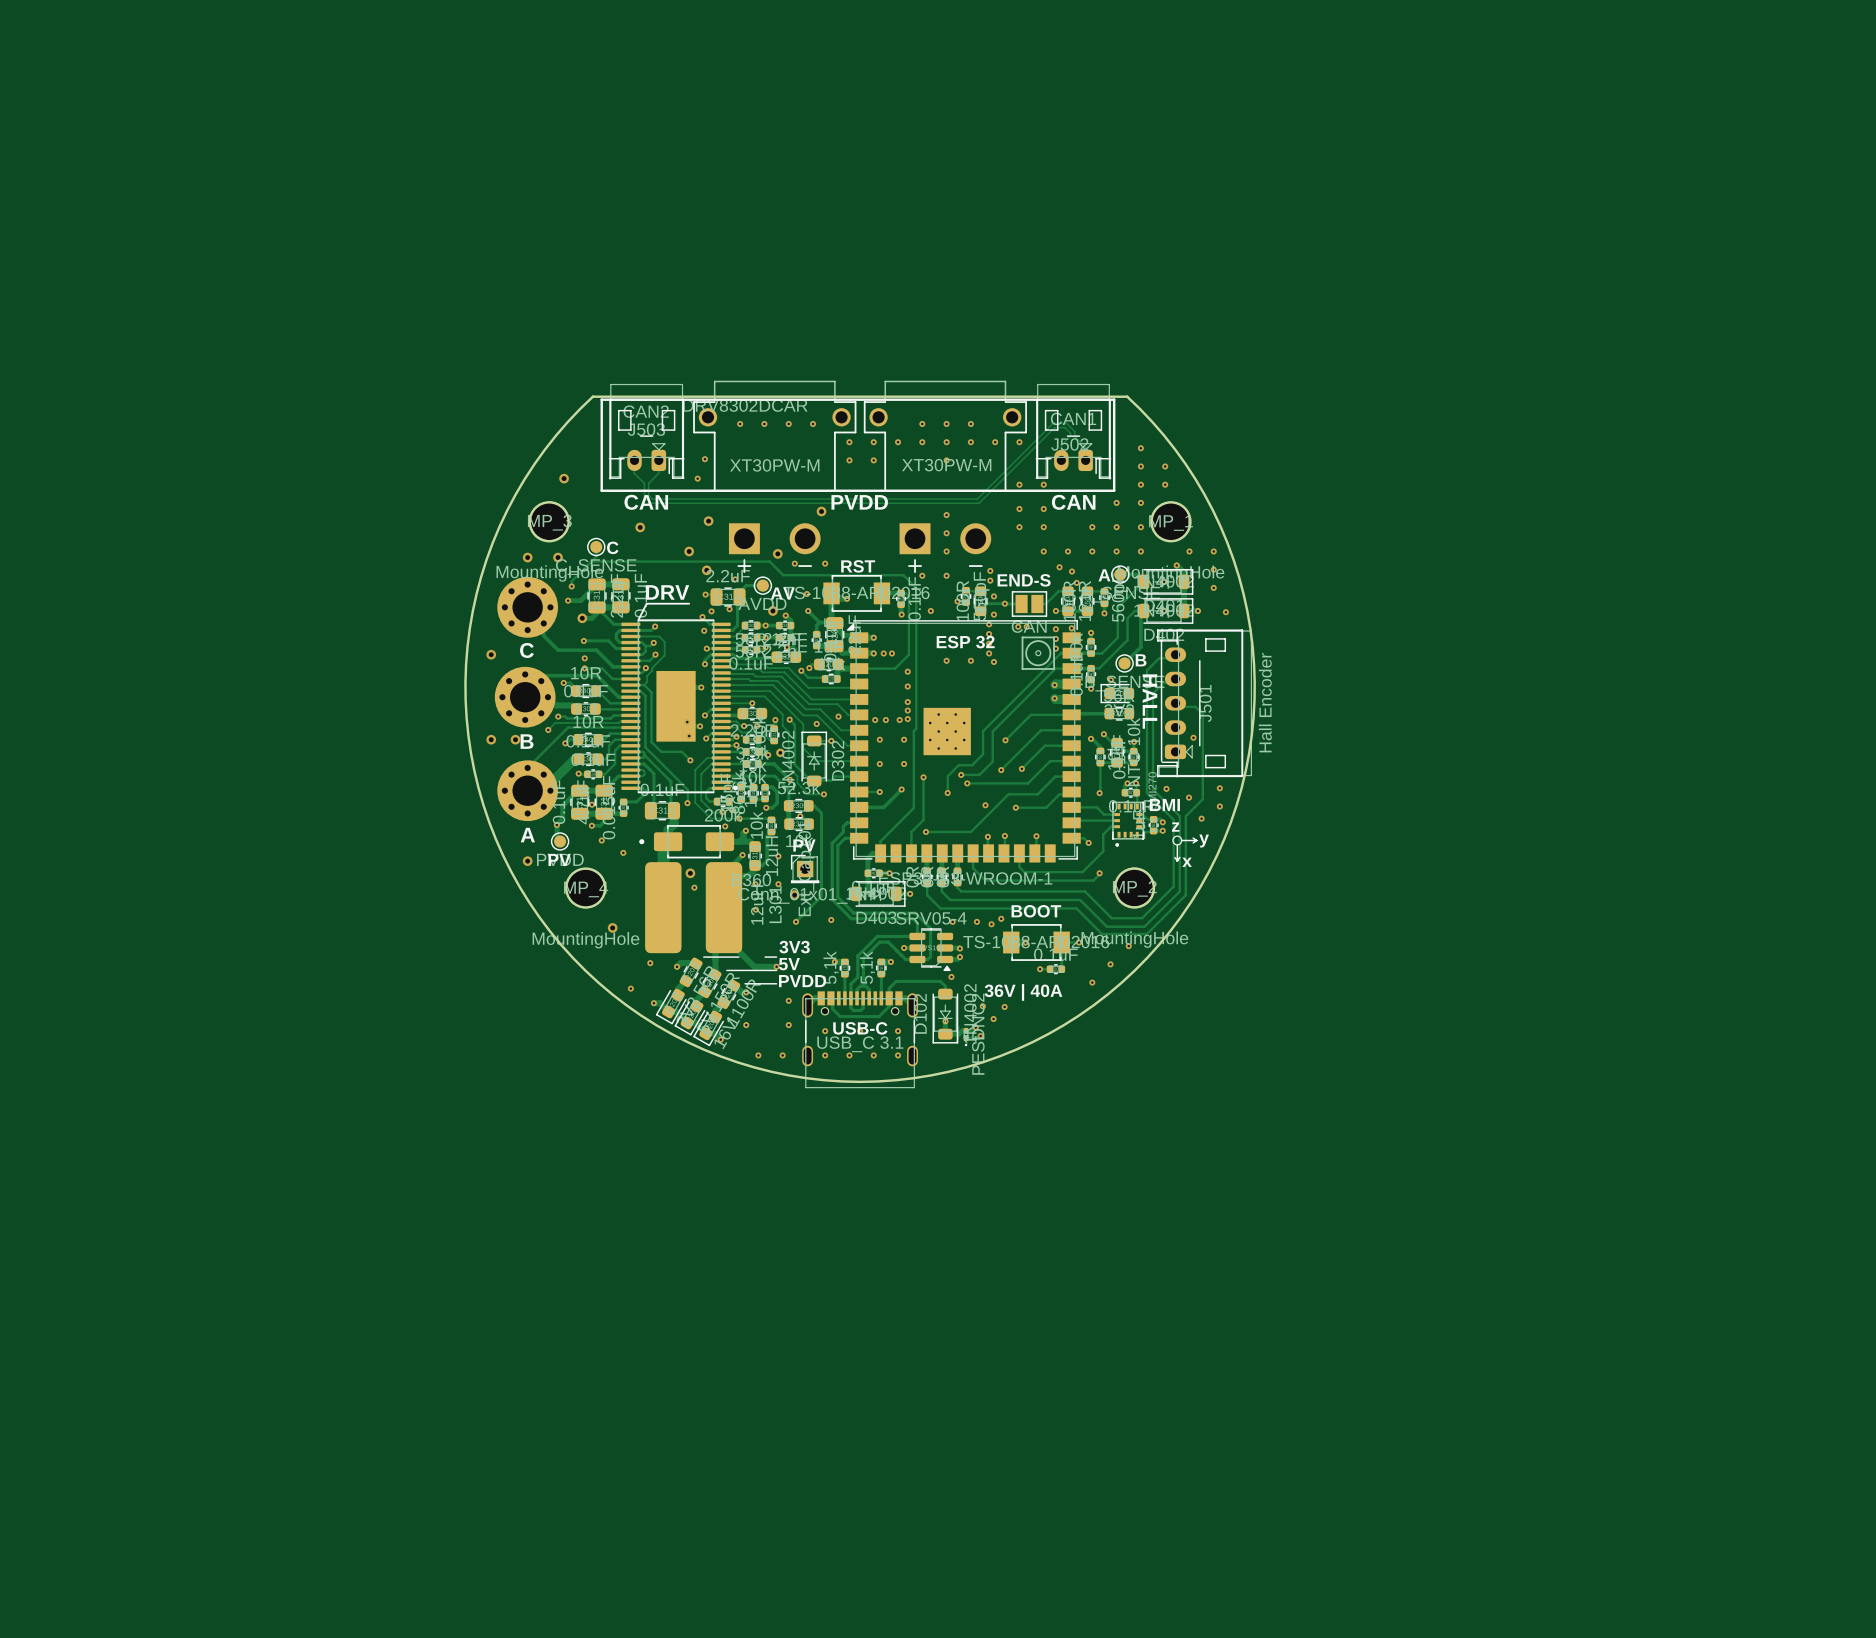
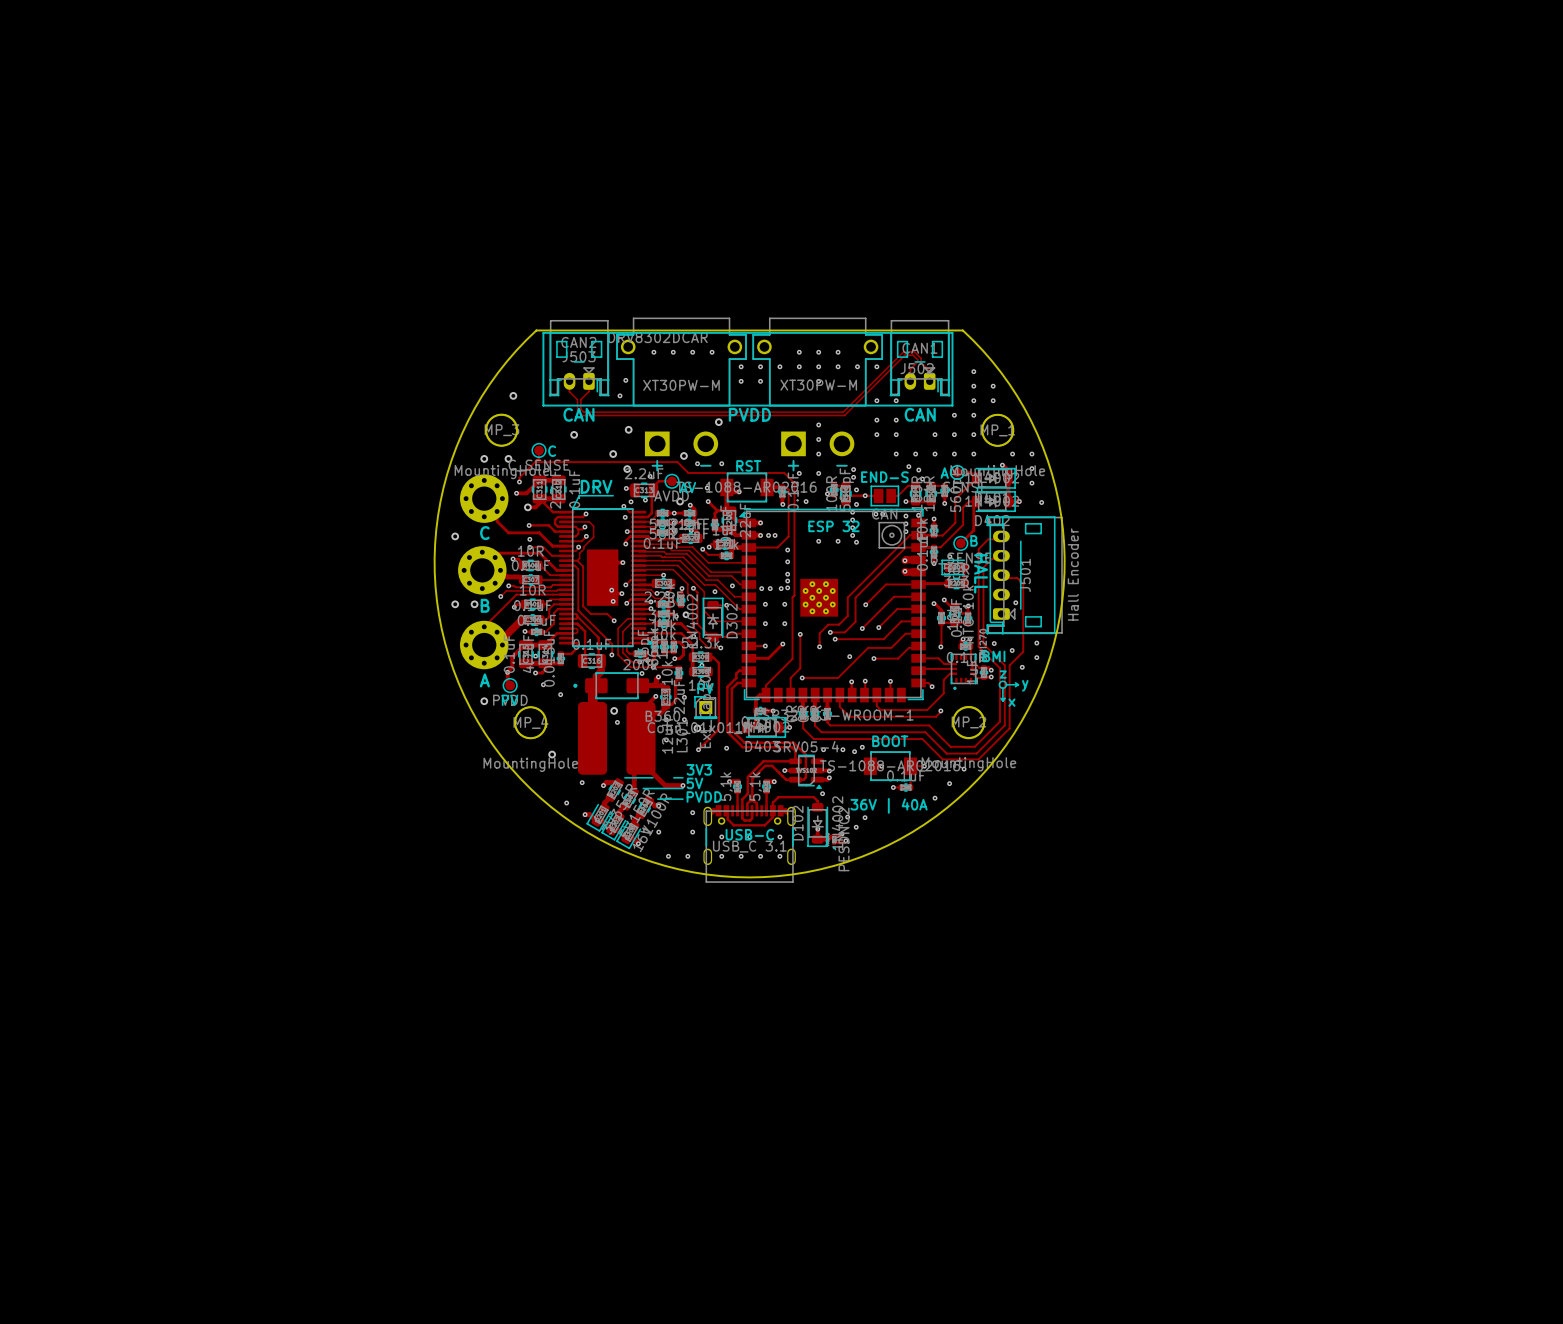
part value: 12uH (772, 856) -> 22uF (679, 697)

